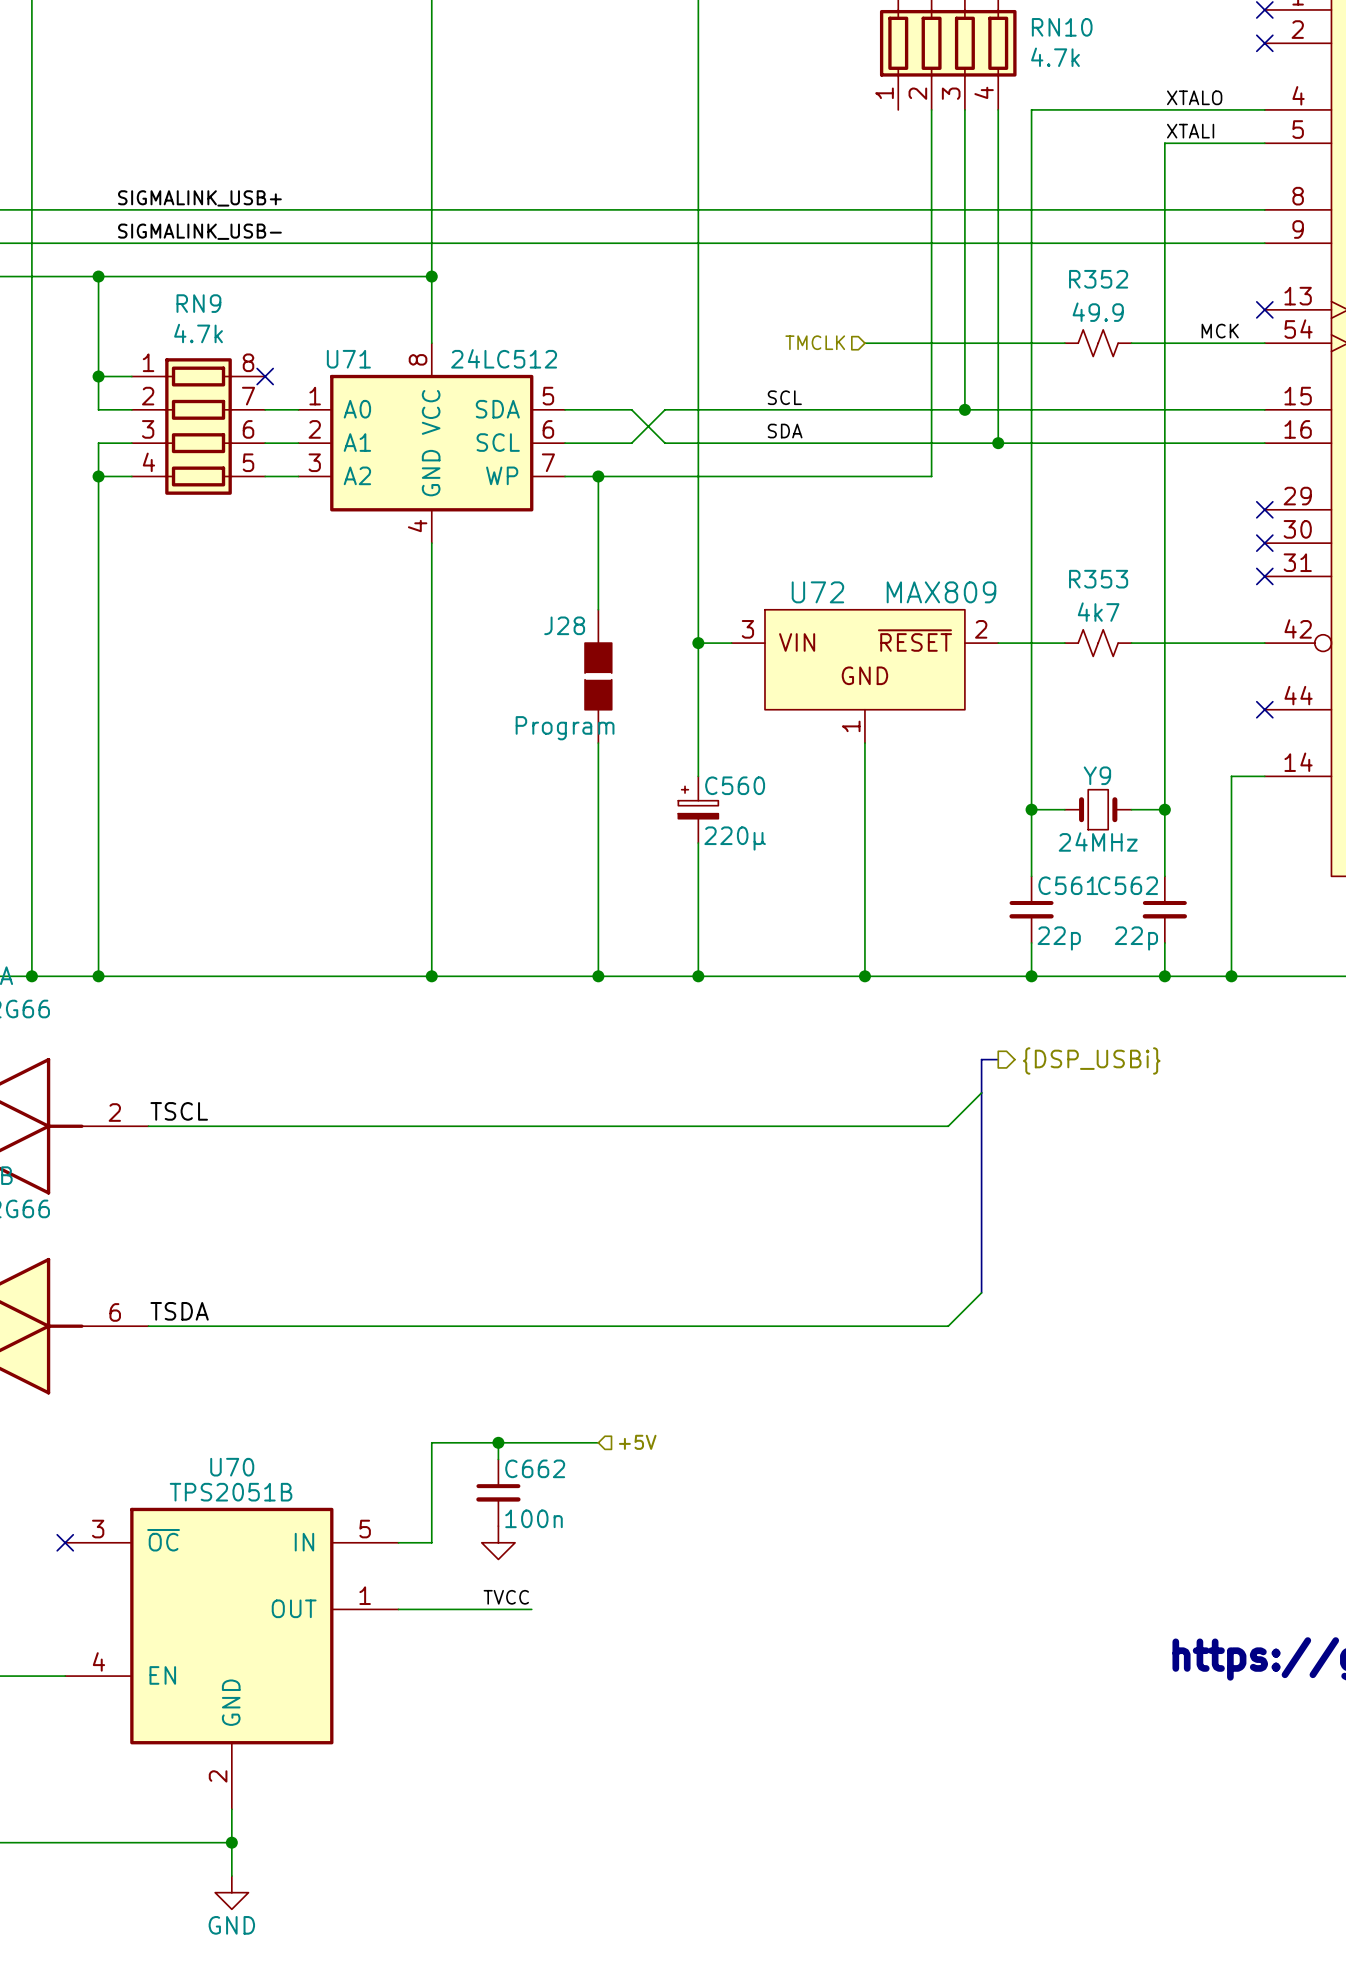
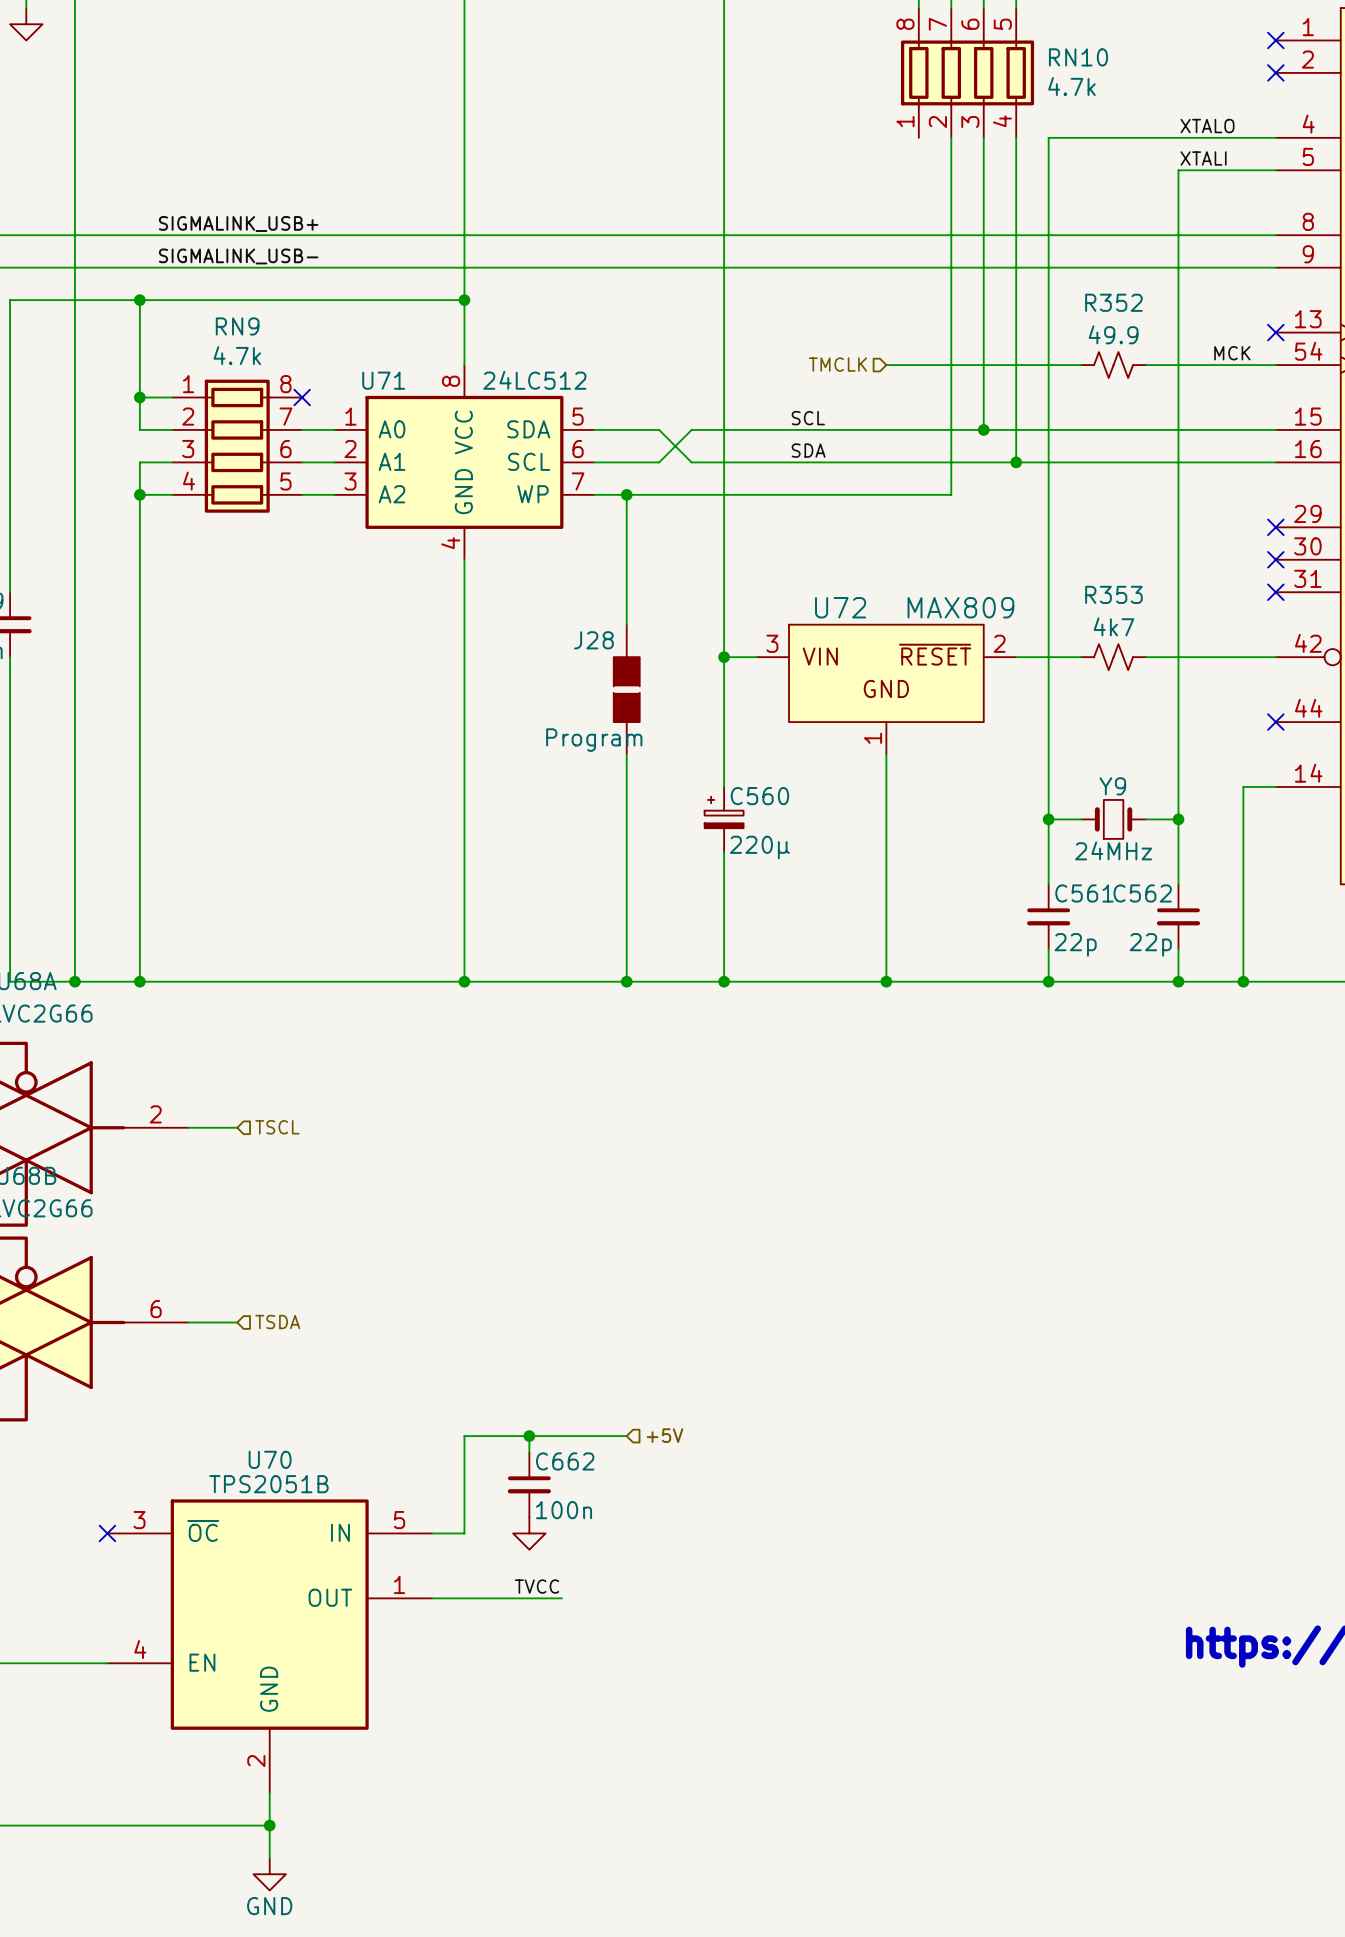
bus: (998, 1059) (981, 1059) (981, 1292) -> none
hierarchical label: {DSP_USBi} (1091, 1060) -> none
wire: (981, 1092) (948, 1126) (198, 1126) -> none
label: TSCL (179, 1111) -> none
hierarchical label: none -> TSCL (277, 1127)
wire: (981, 1292) (948, 1326) (198, 1326) -> none
label: TSDA (179, 1311) -> none
hierarchical label: none -> TSDA (277, 1322)

